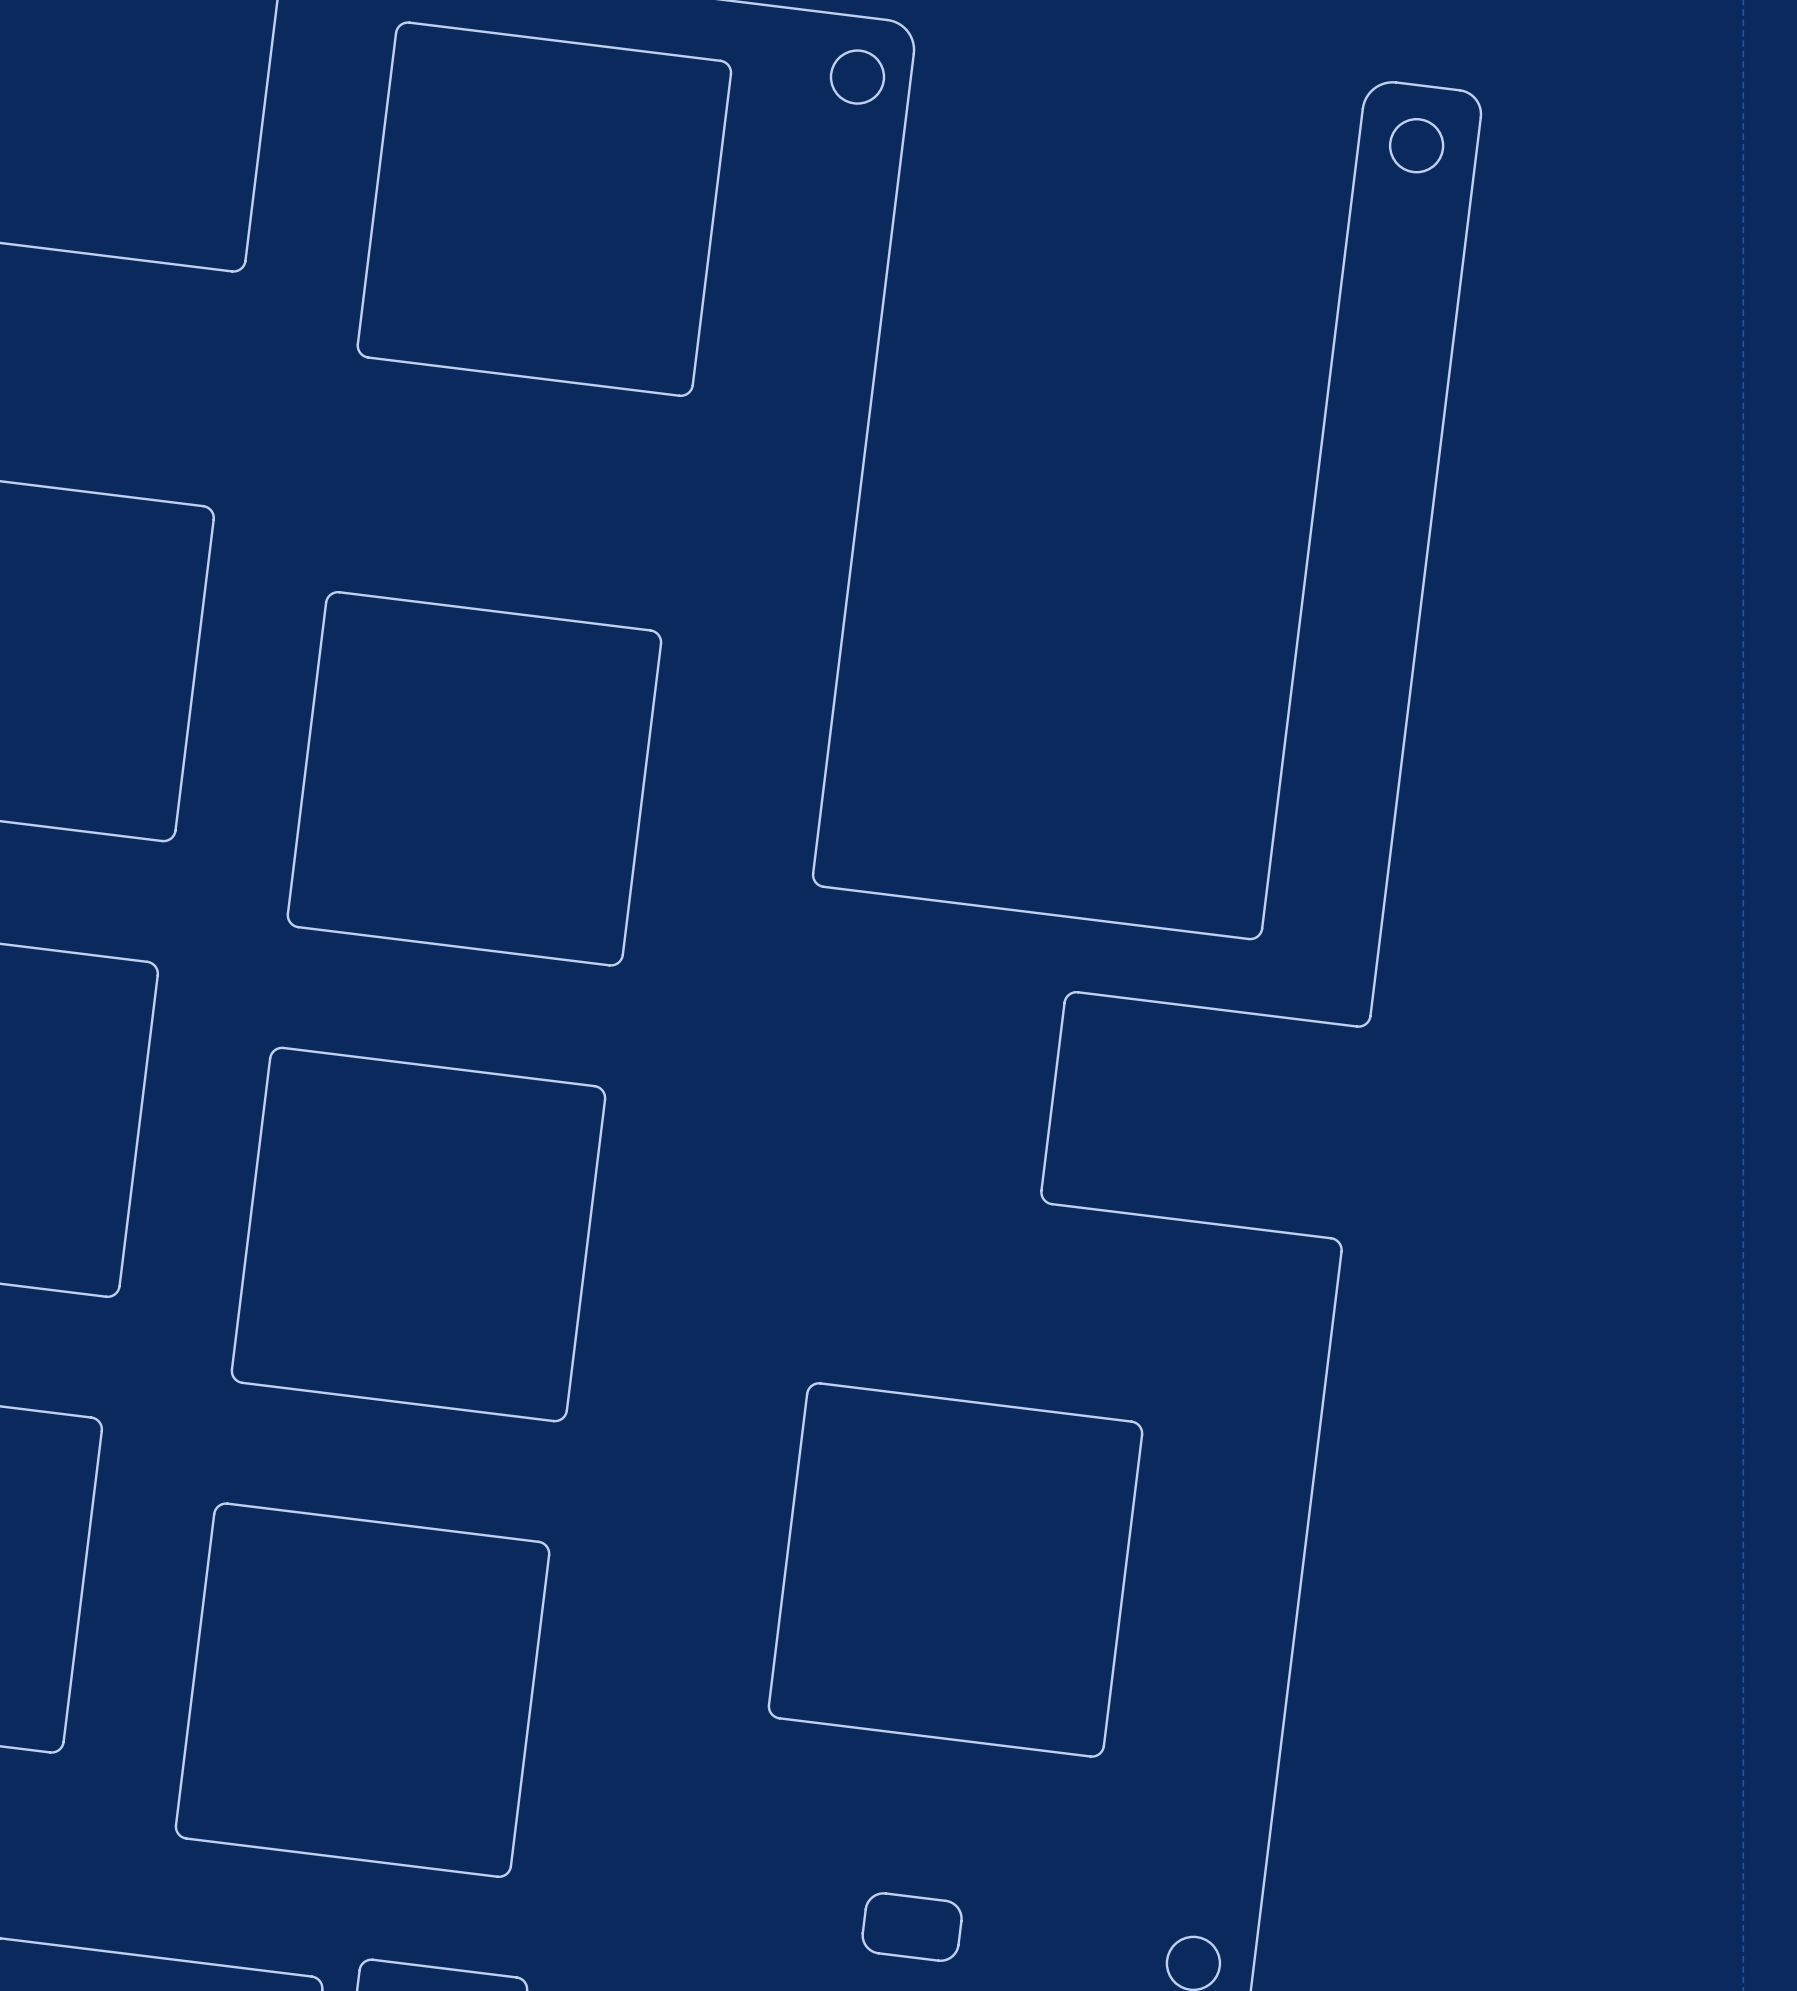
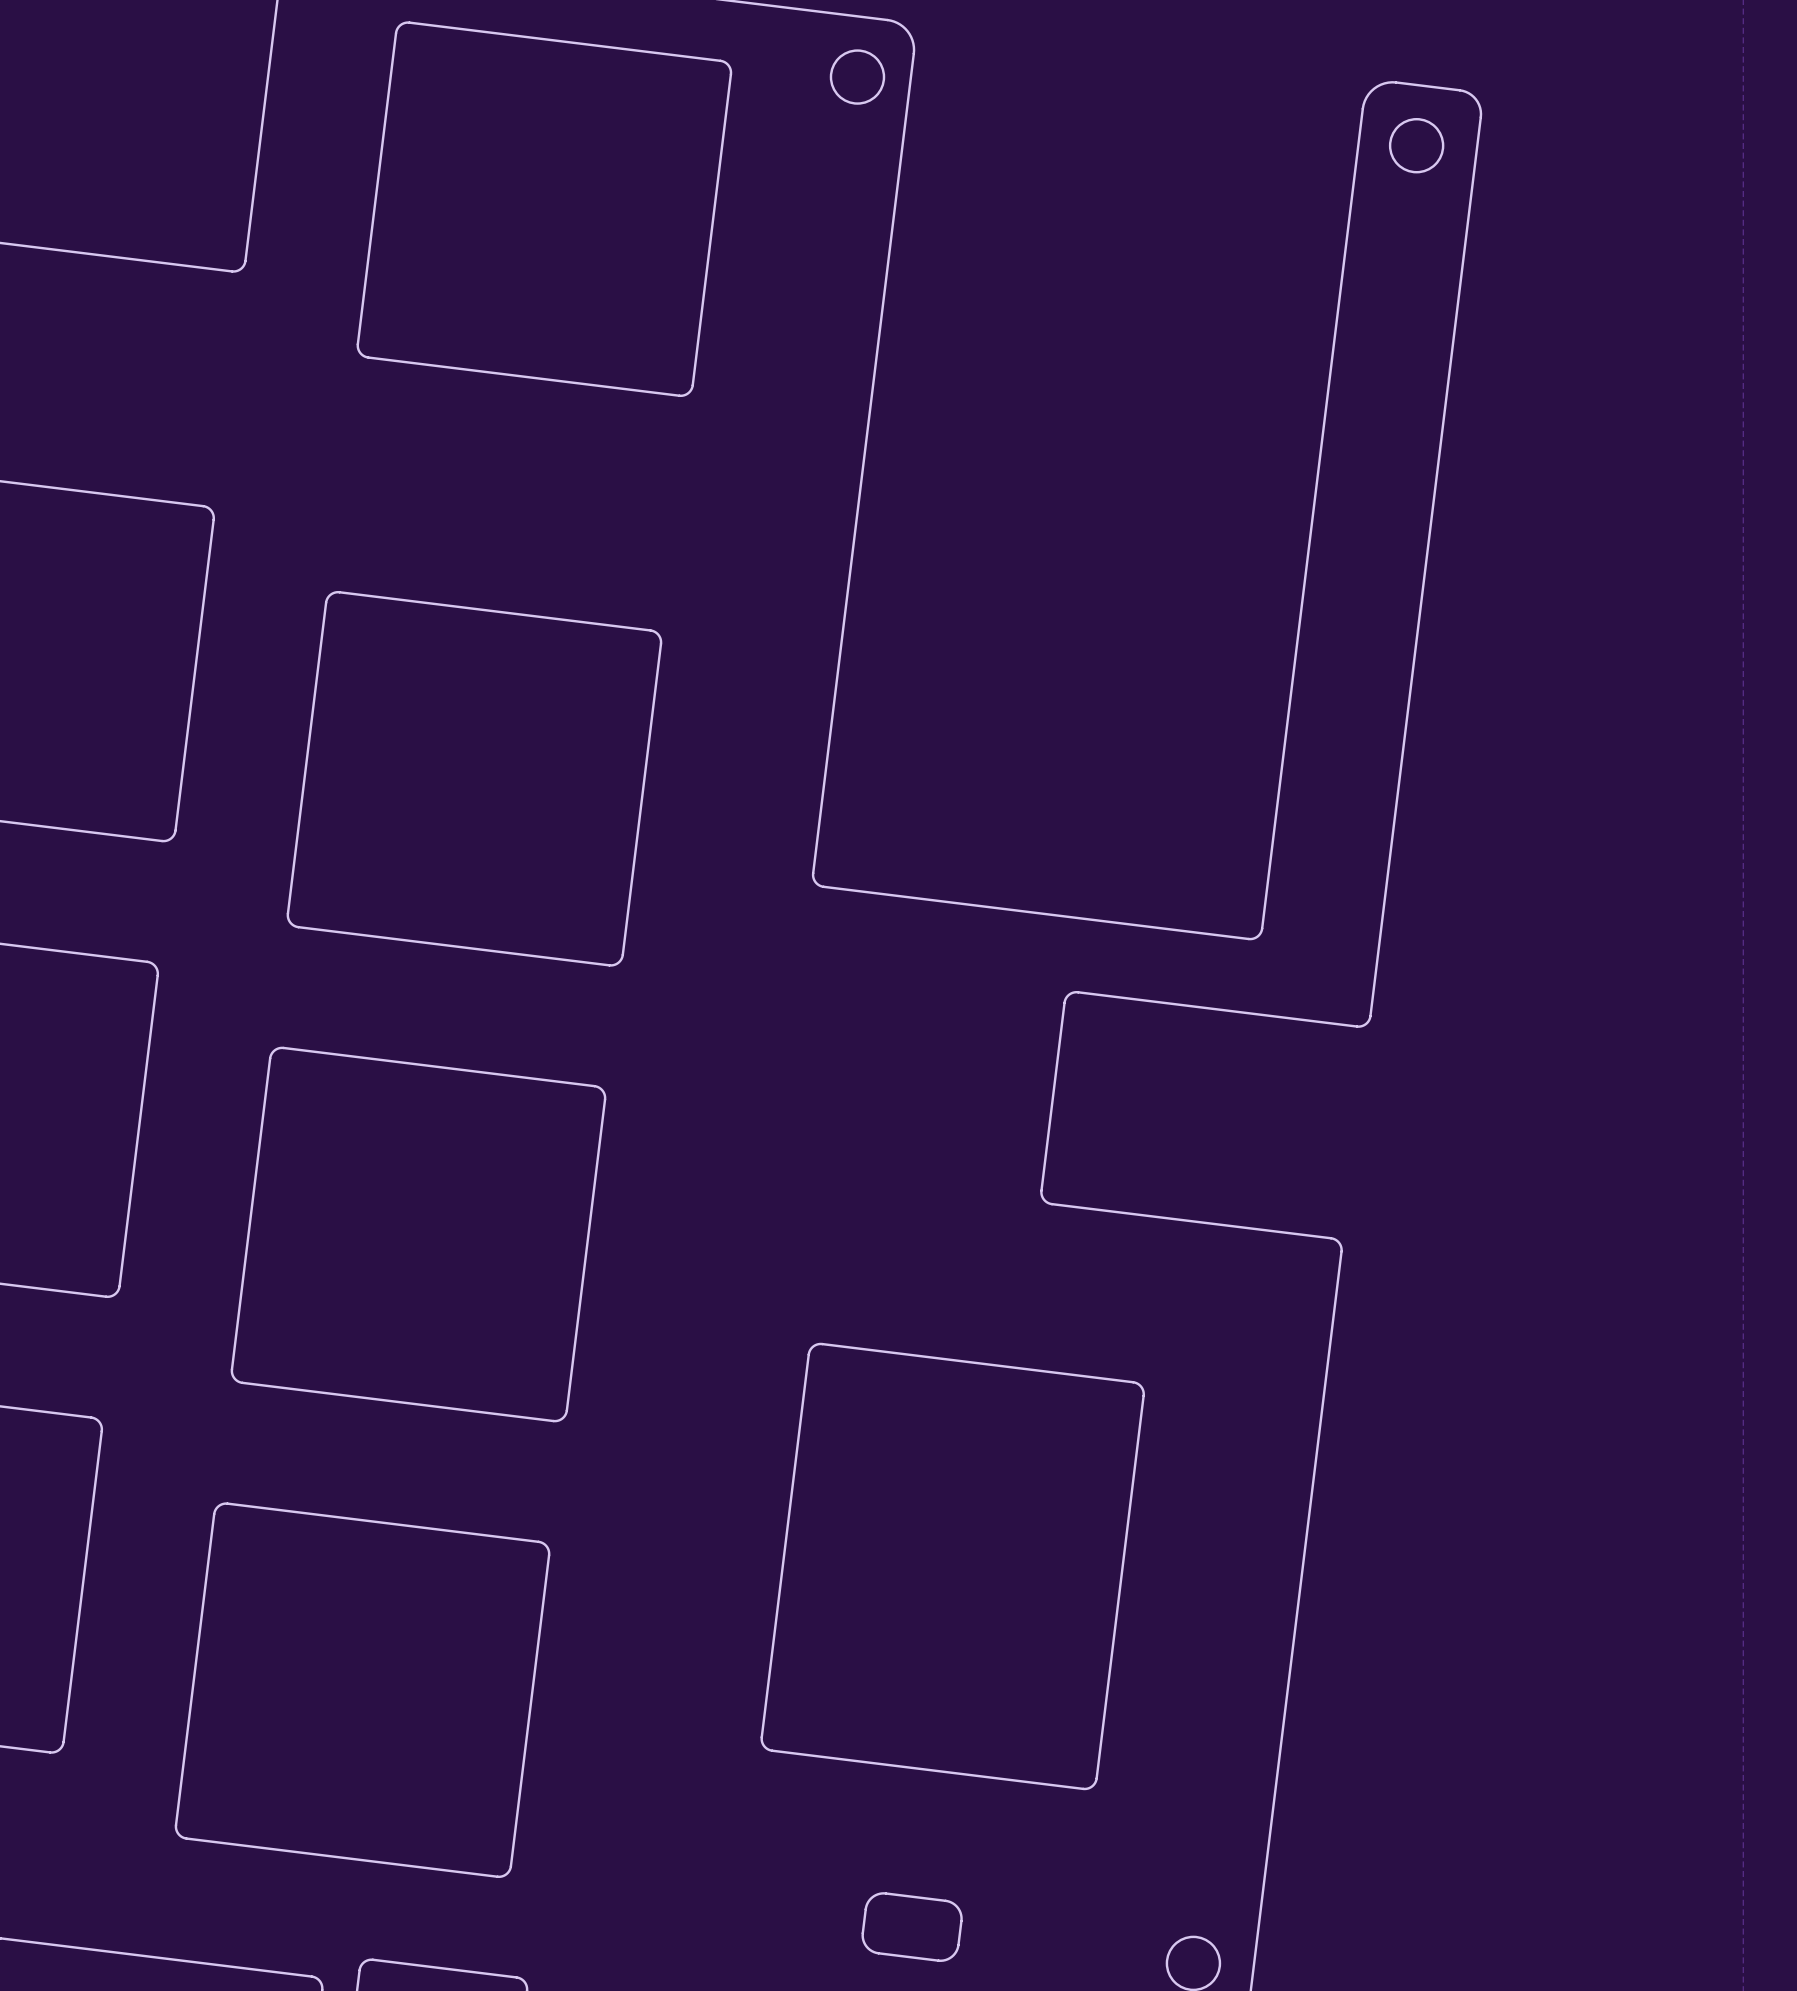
board edge: (820, 1383) (1131, 1421) (1139, 1426) (1142, 1435) (1103, 1746) (1099, 1753) (1090, 1756) (779, 1718) (771, 1713) (768, 1705) (807, 1393) (811, 1385) (820, 1383) -> (822, 1344) (813, 1346) (808, 1354) (761, 1737) (763, 1745) (772, 1750) (1083, 1788) (1090, 1787) (1096, 1778) (1143, 1395) (1142, 1387) (1133, 1382) (822, 1344)

